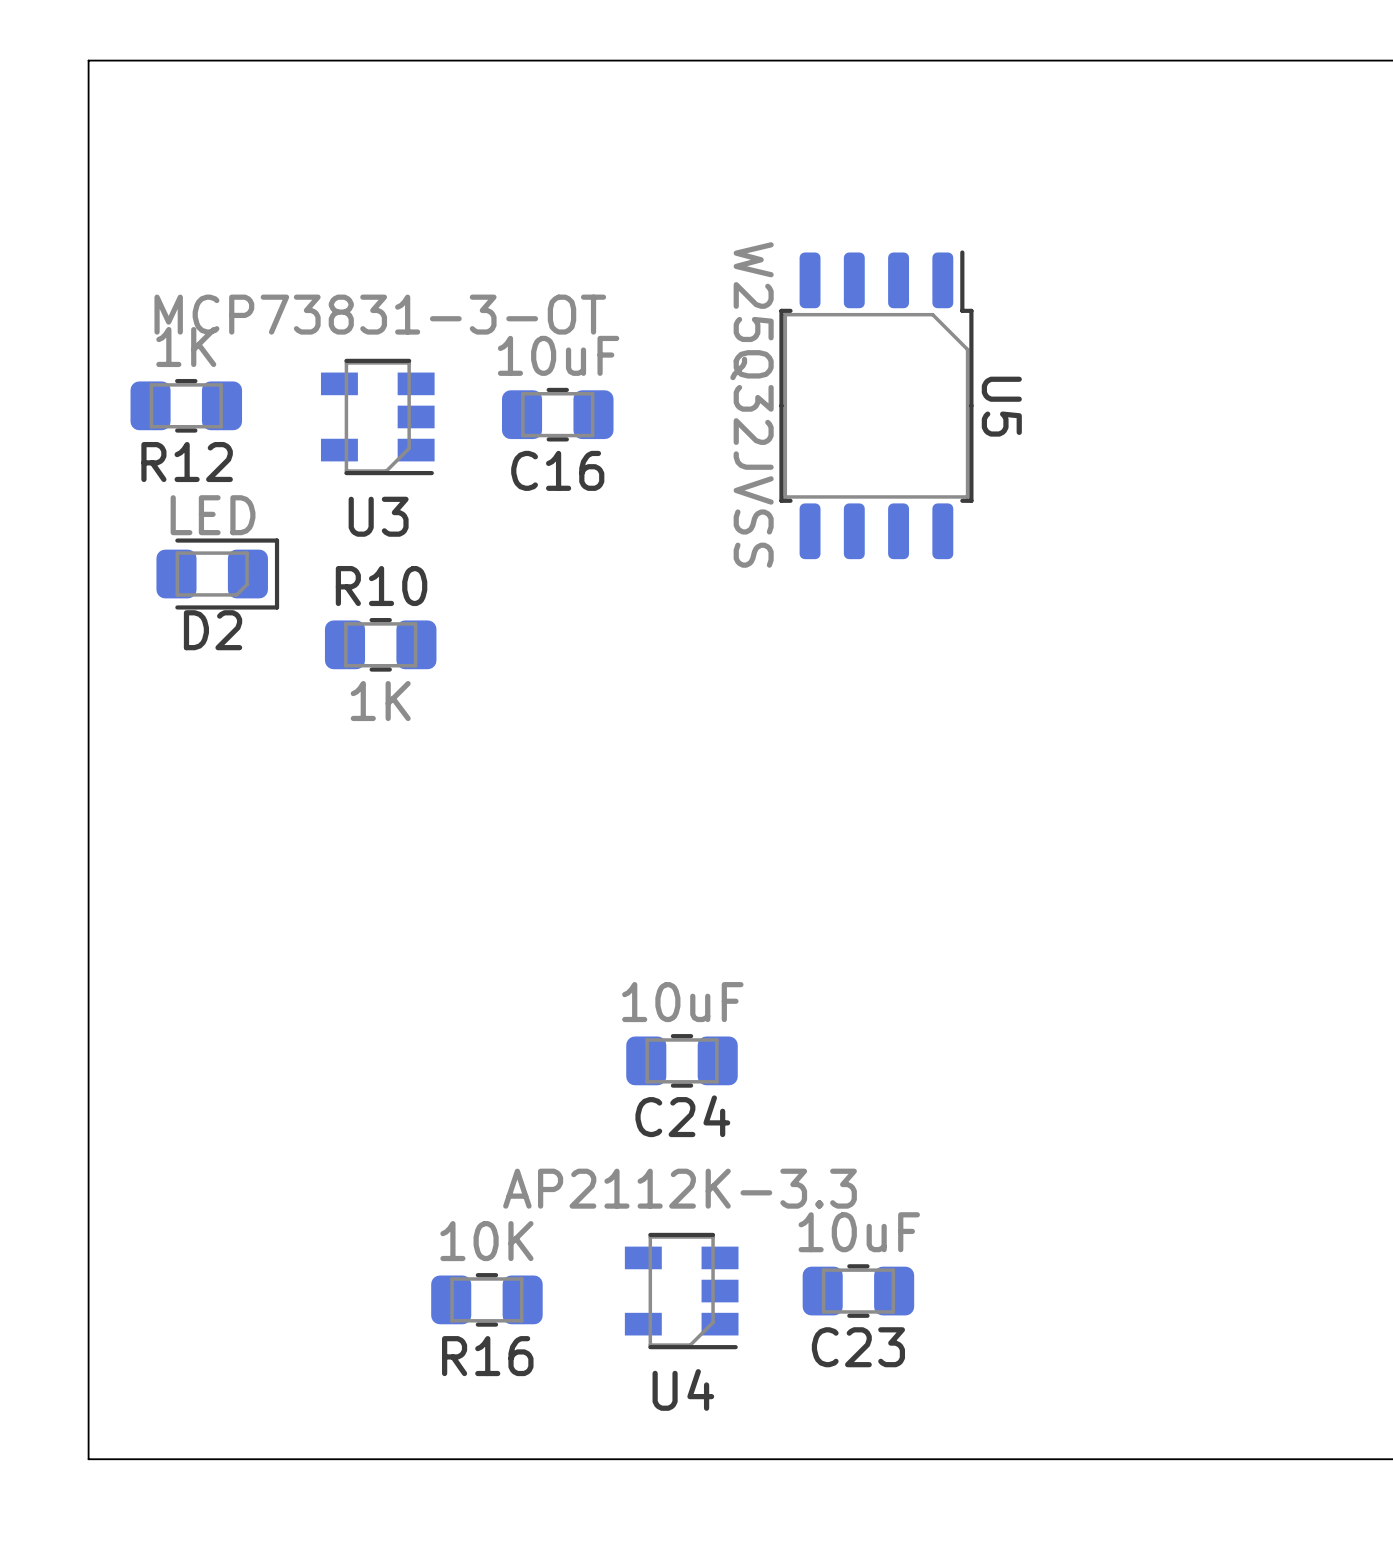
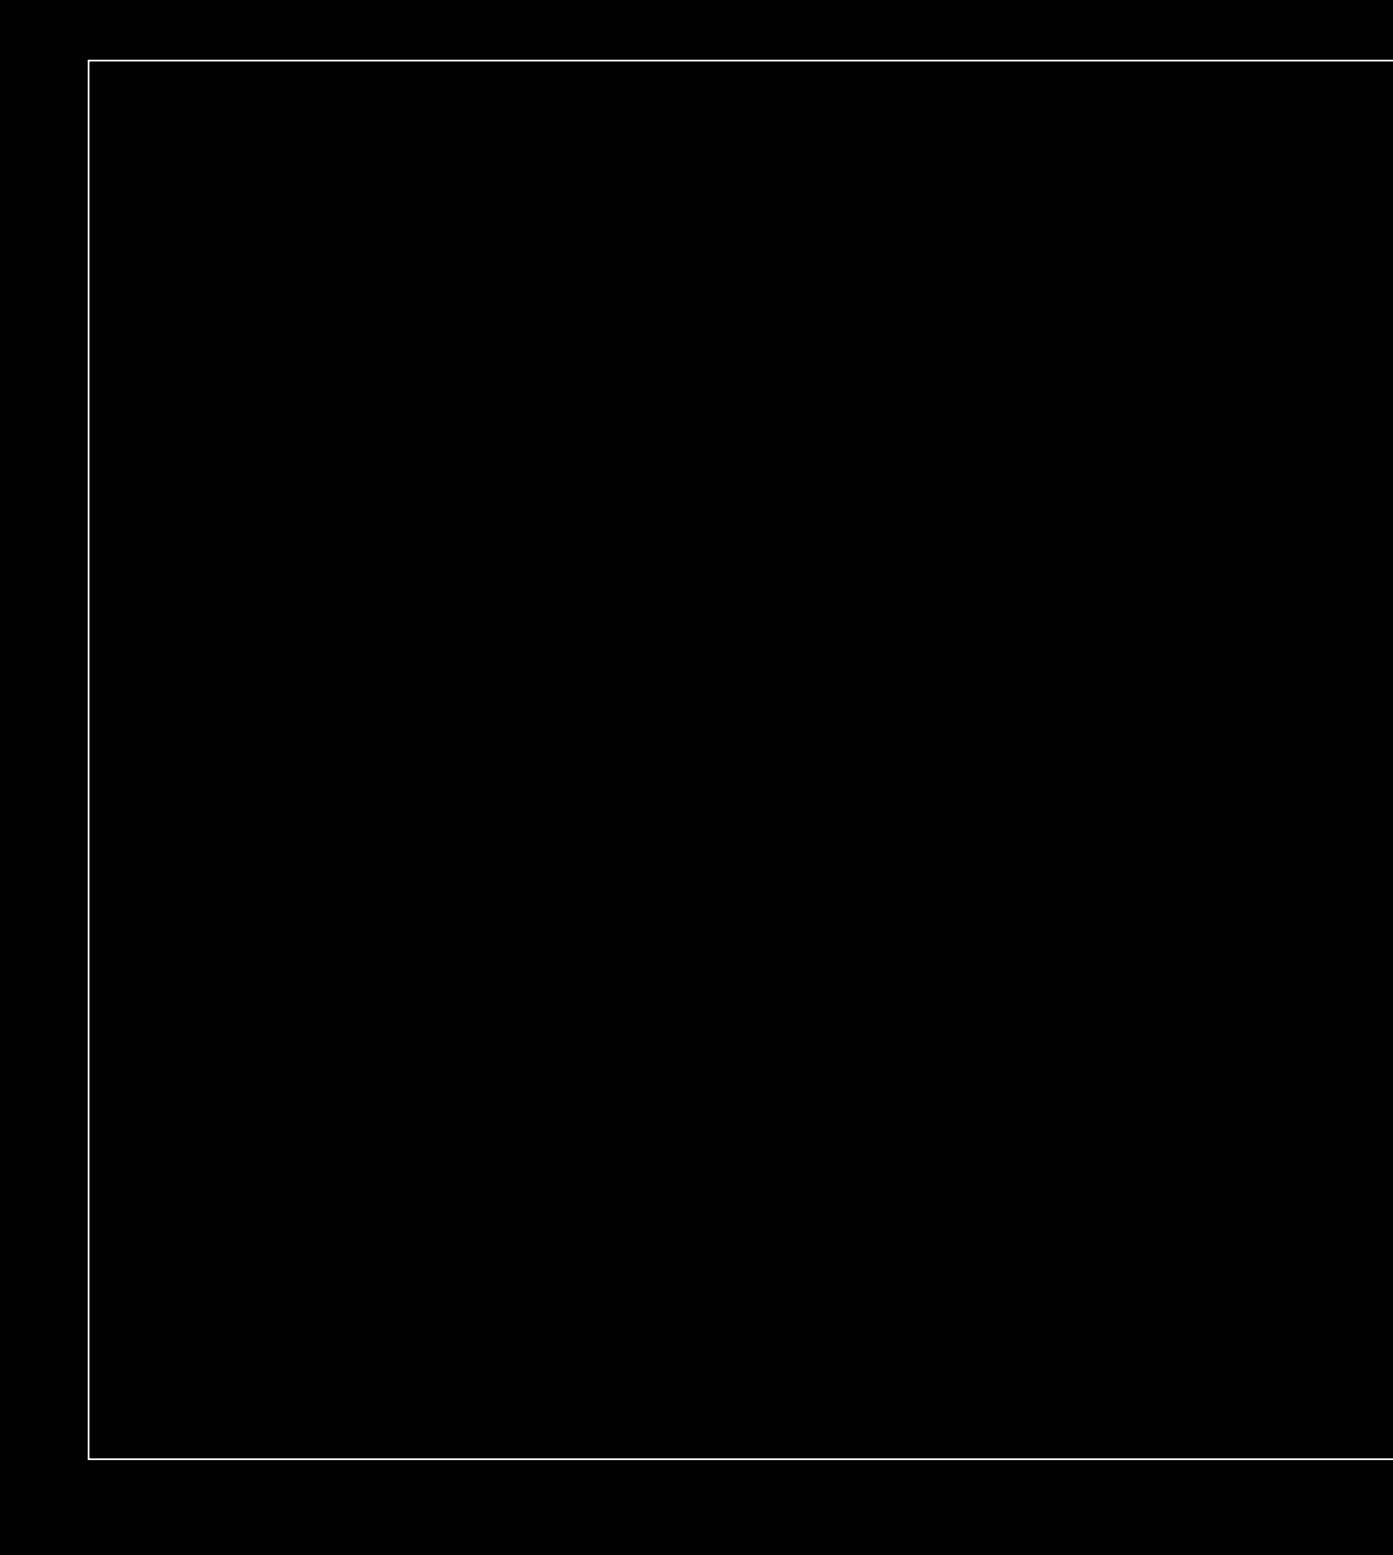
U5: W25Q32JVSS (876, 404) -> none
R12: 1K (186, 405) -> none
C16: 10uF (557, 414) -> none
U3: MCP73831-3-OT (377, 416) -> none
D2: LED (217, 574) -> none
R10: 1K (380, 644) -> none
C24: 10uF (682, 1060) -> none
U4: AP2112K-3.3 (681, 1291) -> none
C23: 10uF (858, 1291) -> none
R16: 10K (486, 1299) -> none

